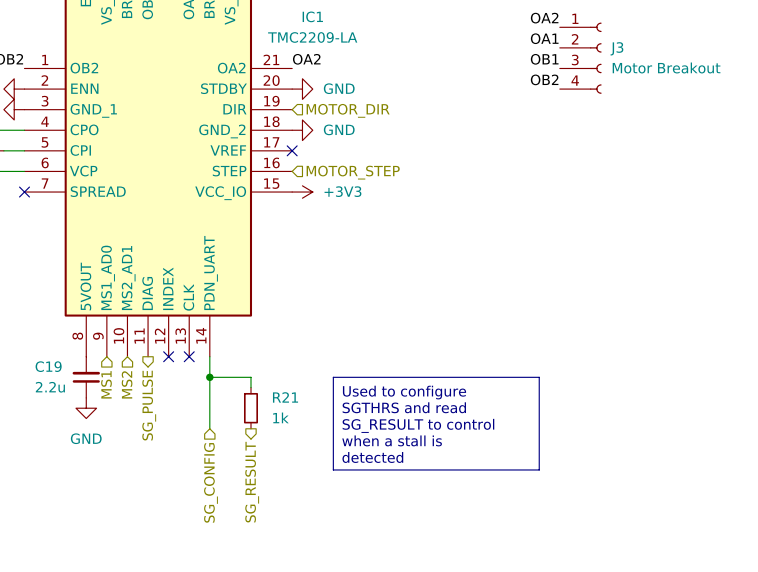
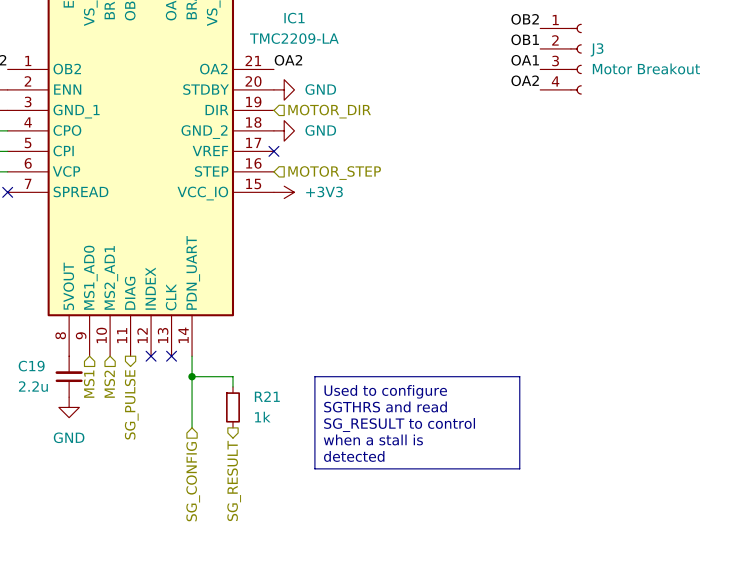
label: OA2 (544, 18) -> OB2 (525, 19)
label: OA1 (544, 38) -> OB1 (525, 39)
label: OB1 (544, 59) -> OA1 (525, 60)
label: OB2 (544, 79) -> OA2 (525, 80)

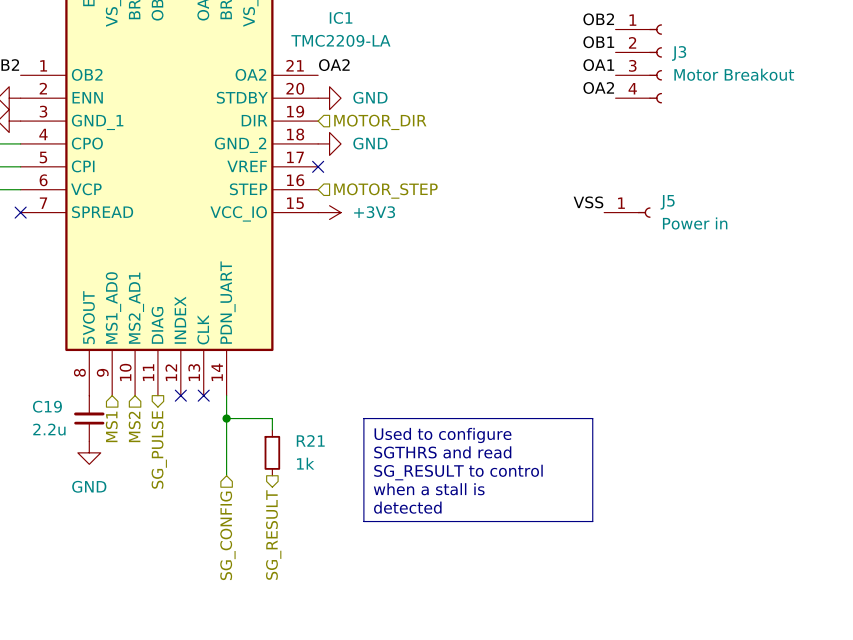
label: none -> VSS (588, 202)
J5: none -> Power in (627, 212)

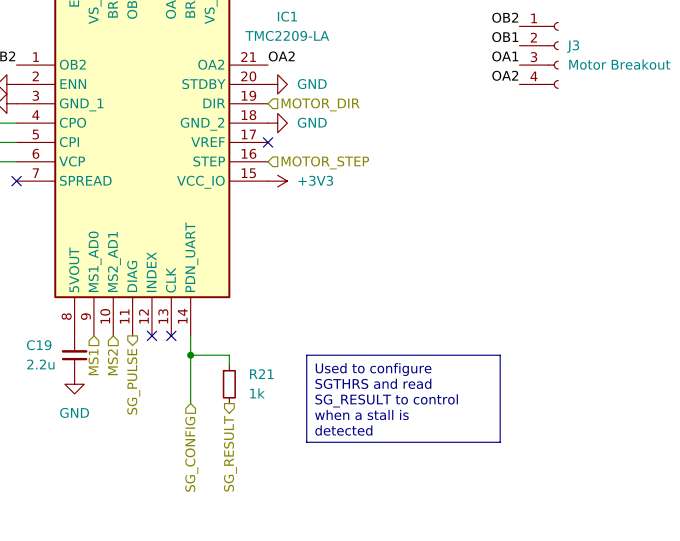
label: VSS (588, 202) -> none
J5: Power in (627, 212) -> none

